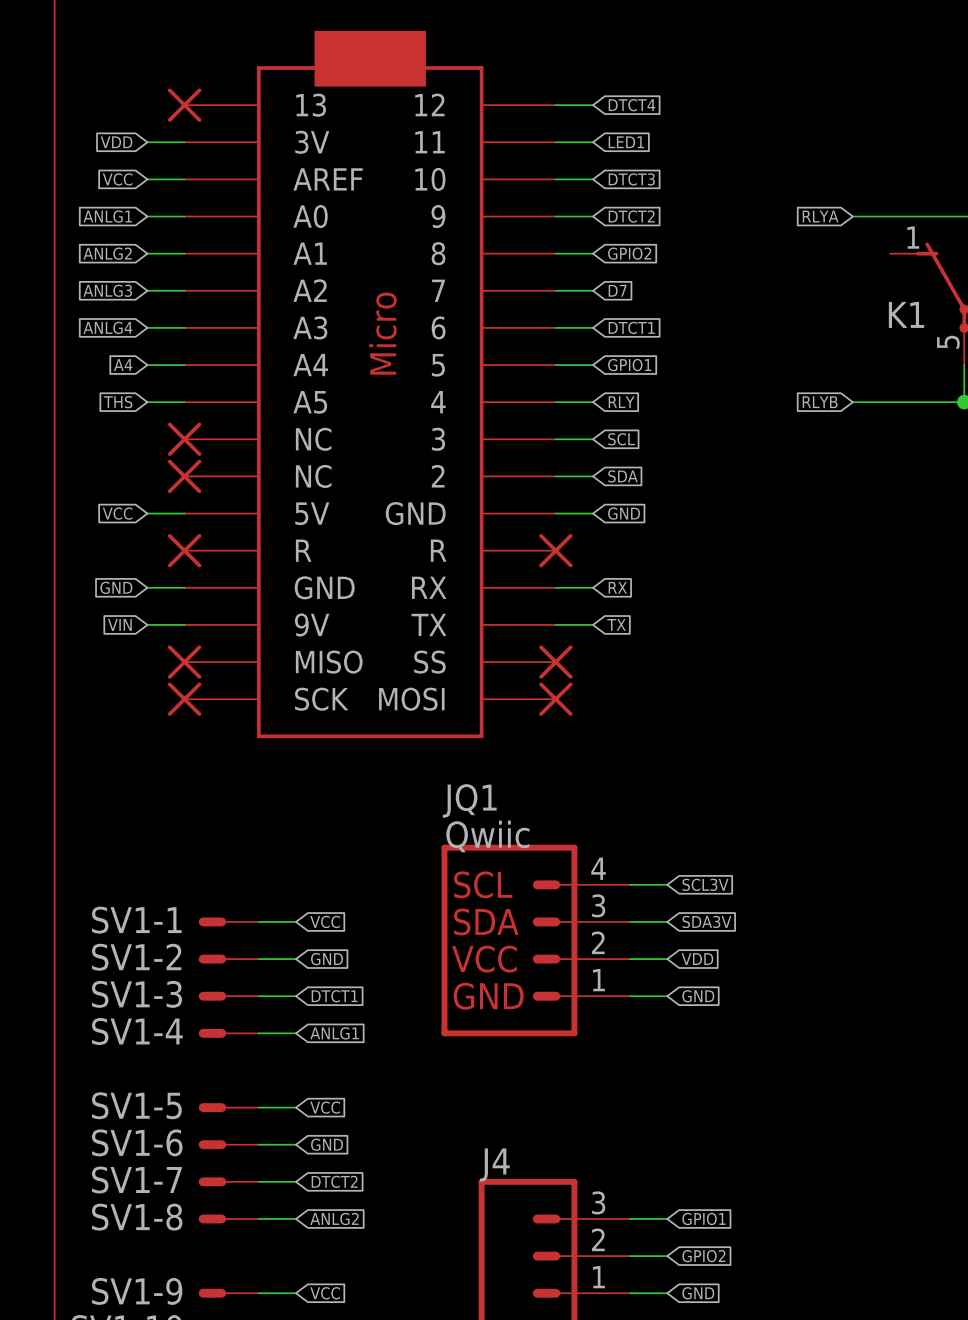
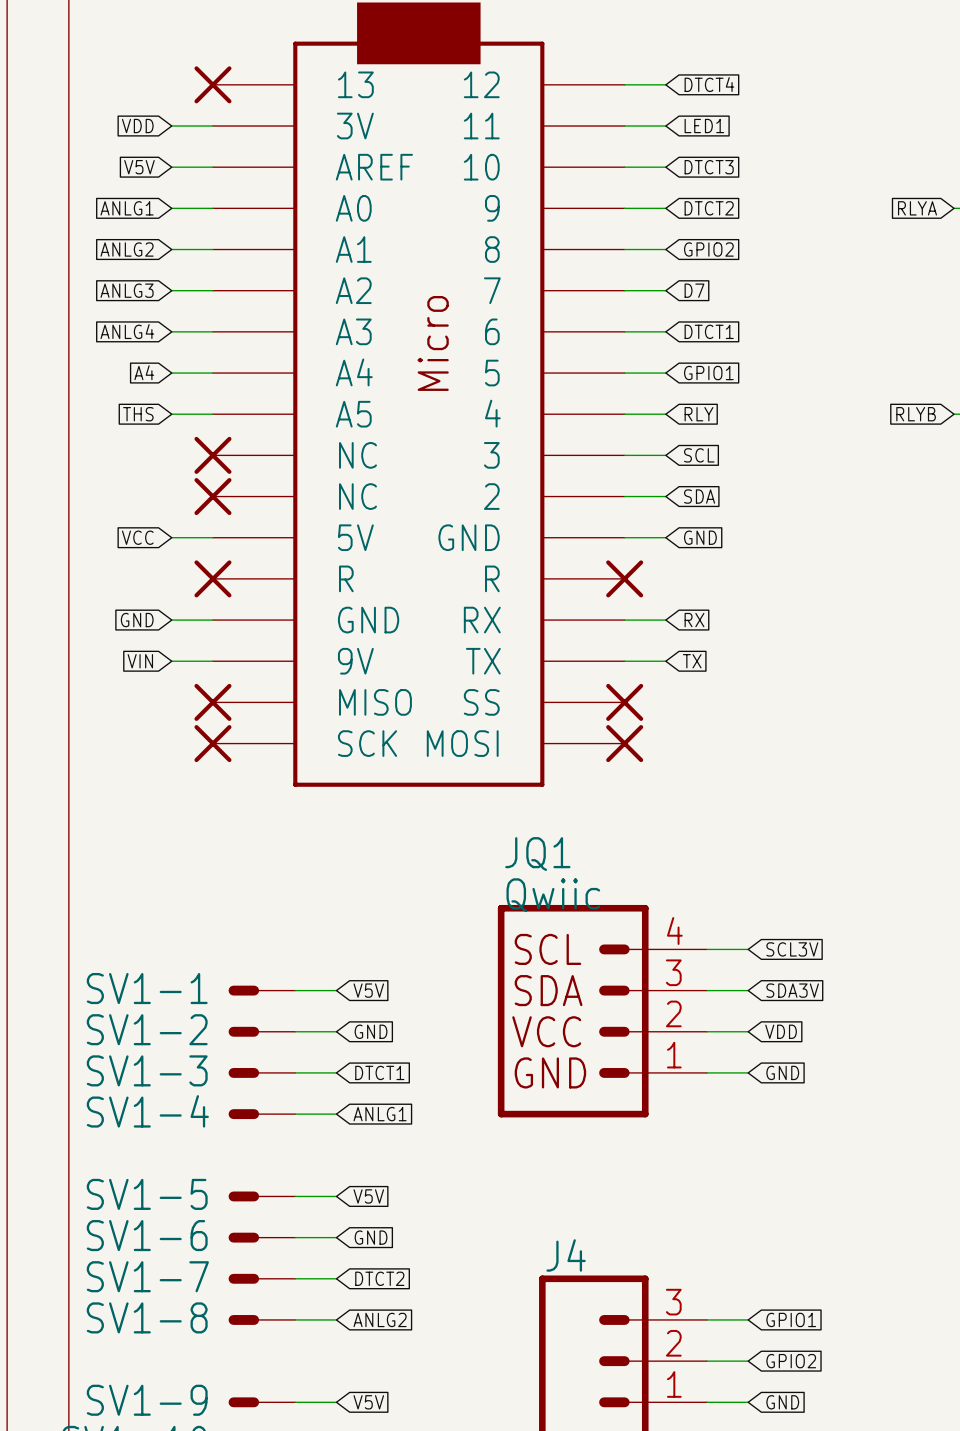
global label: VCC (117, 179) -> V5V (139, 167)
global label: VCC (325, 921) -> V5V (368, 990)
global label: VCC (325, 1107) -> V5V (368, 1196)
global label: VCC (325, 1293) -> V5V (368, 1402)

